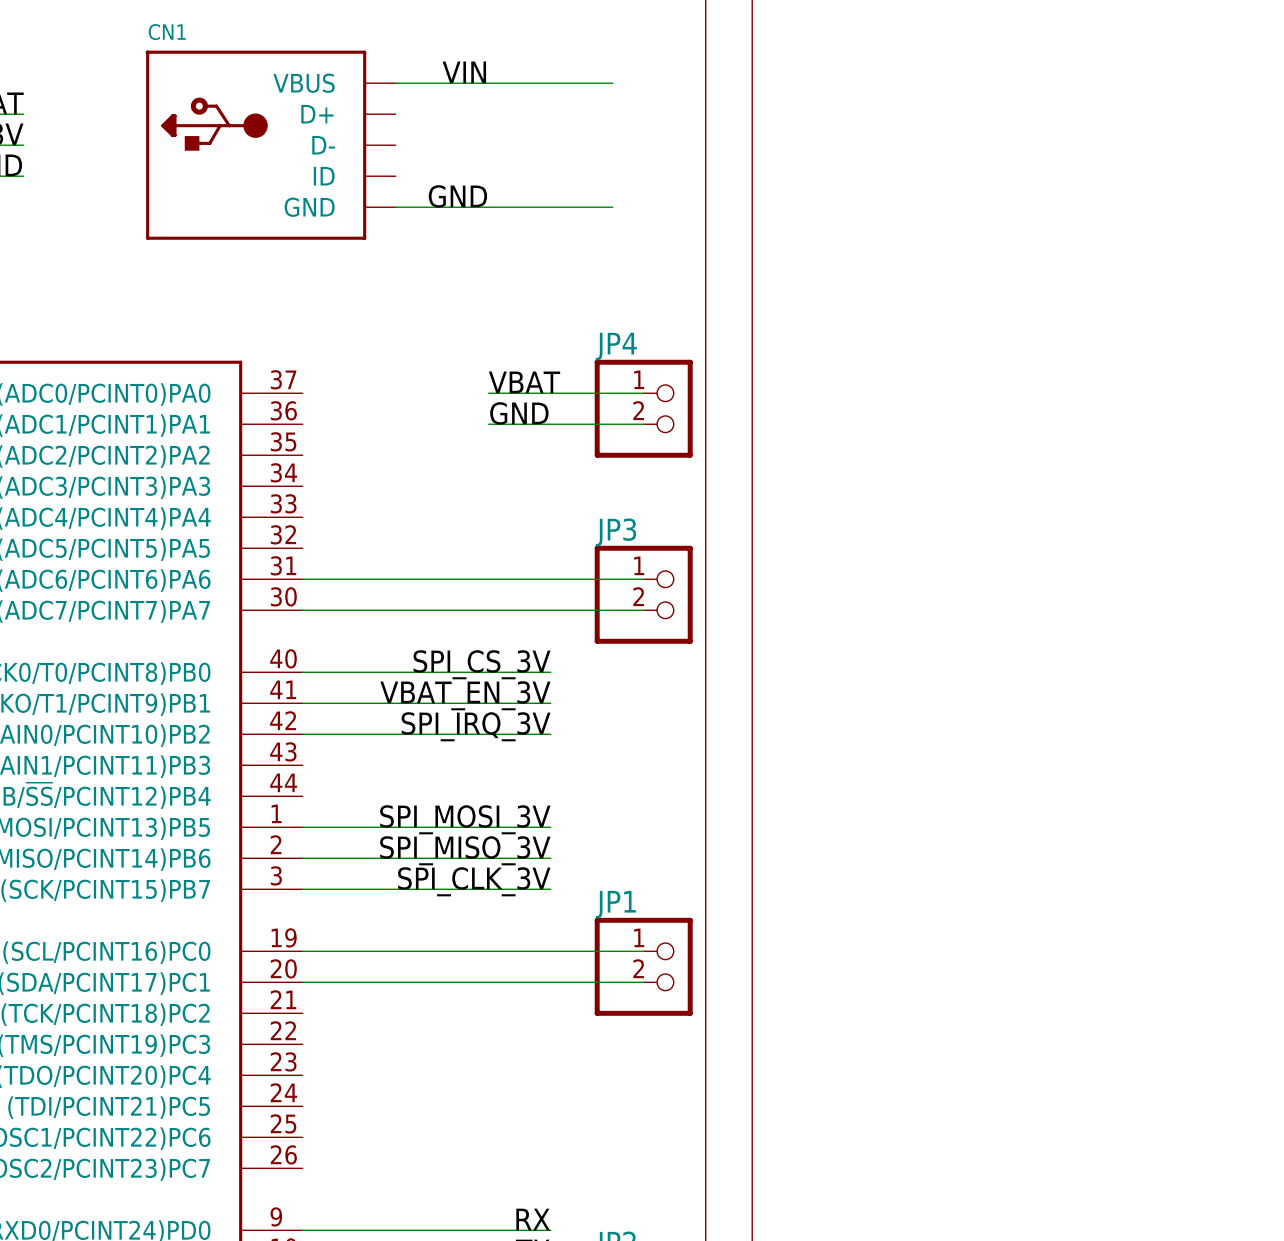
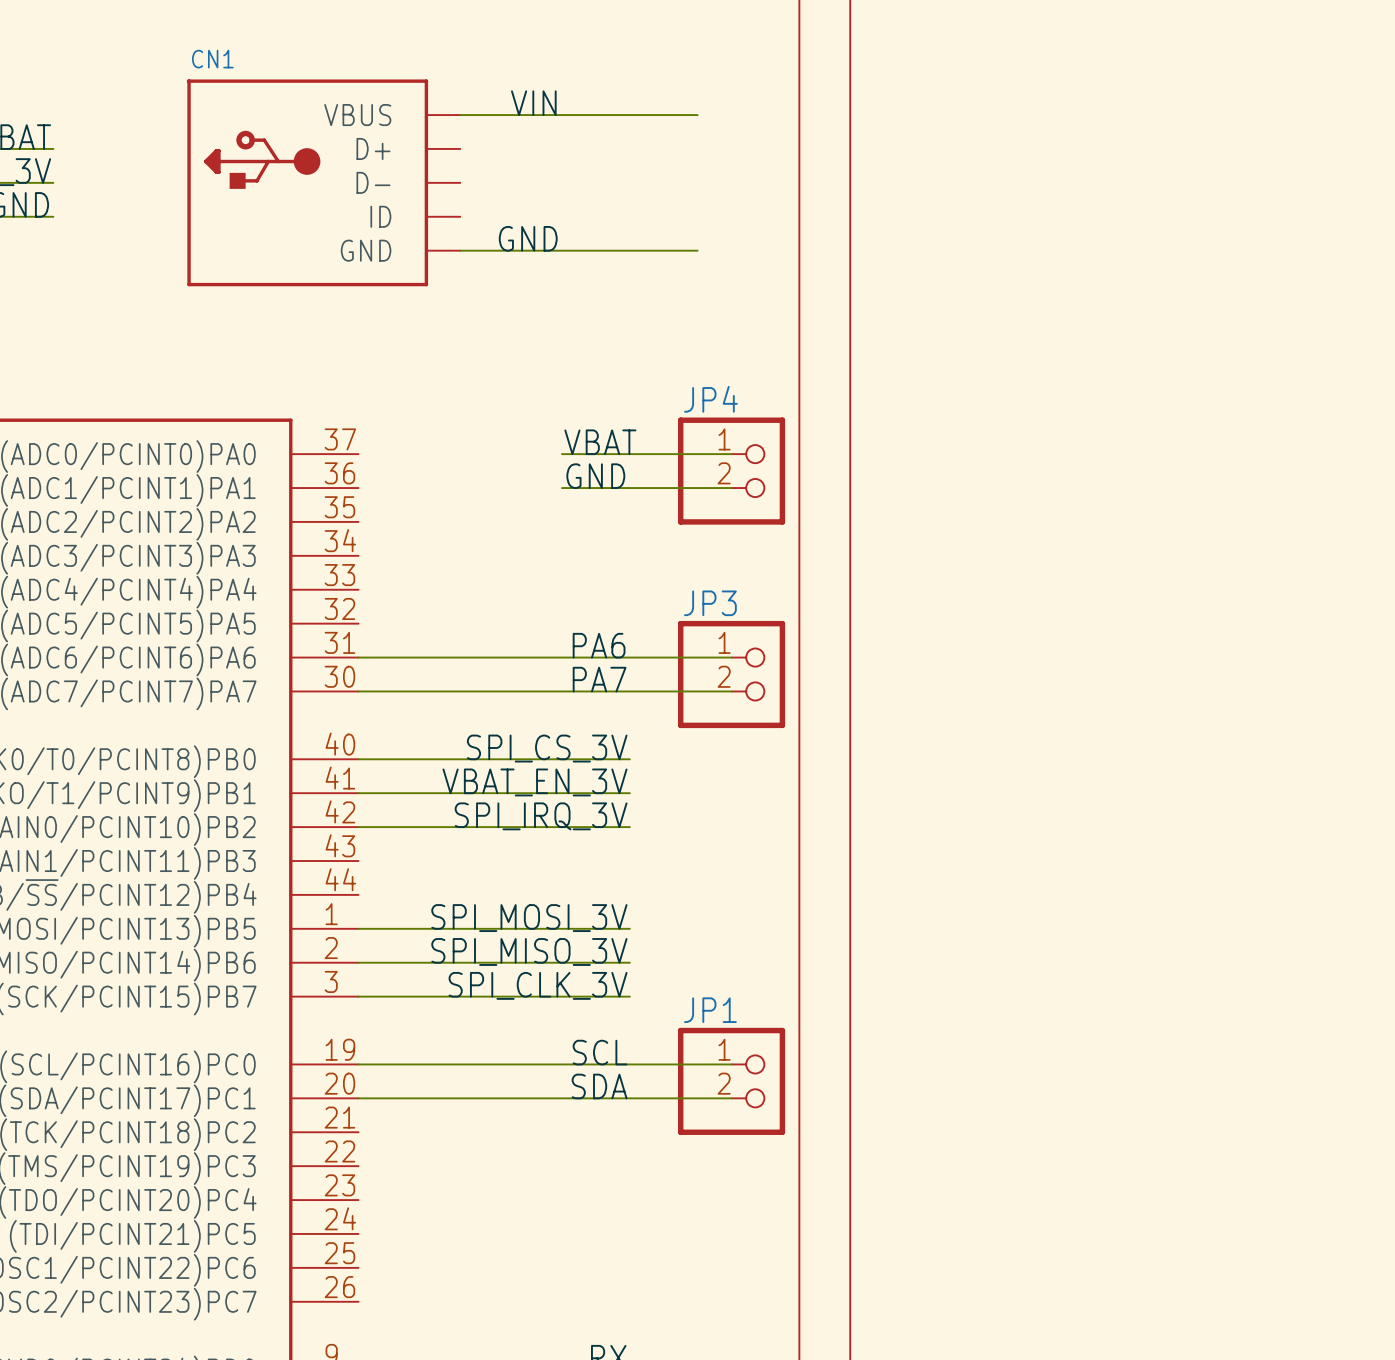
label: none -> PA6 (599, 645)
label: none -> PA7 (599, 679)
label: none -> SCL (600, 1052)
label: none -> SDA (599, 1086)

